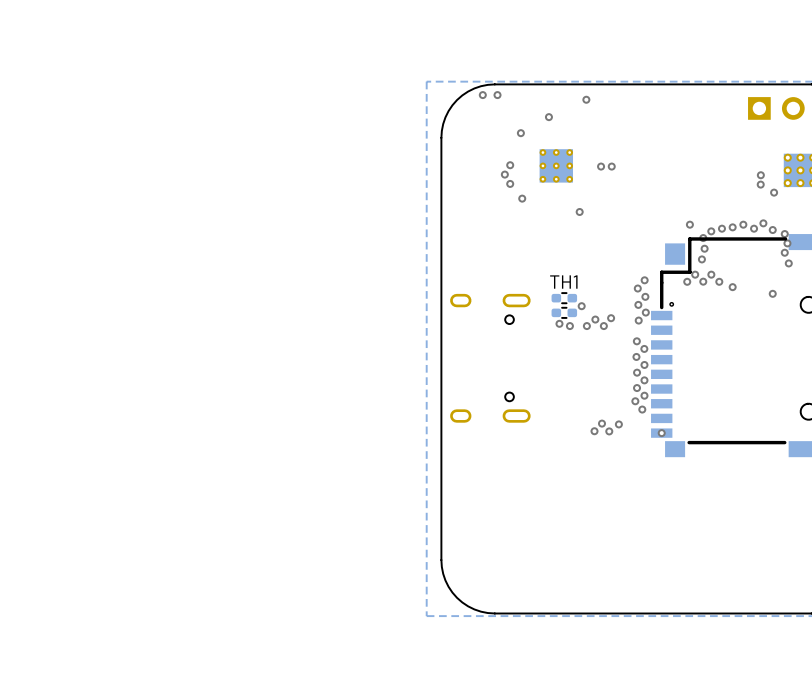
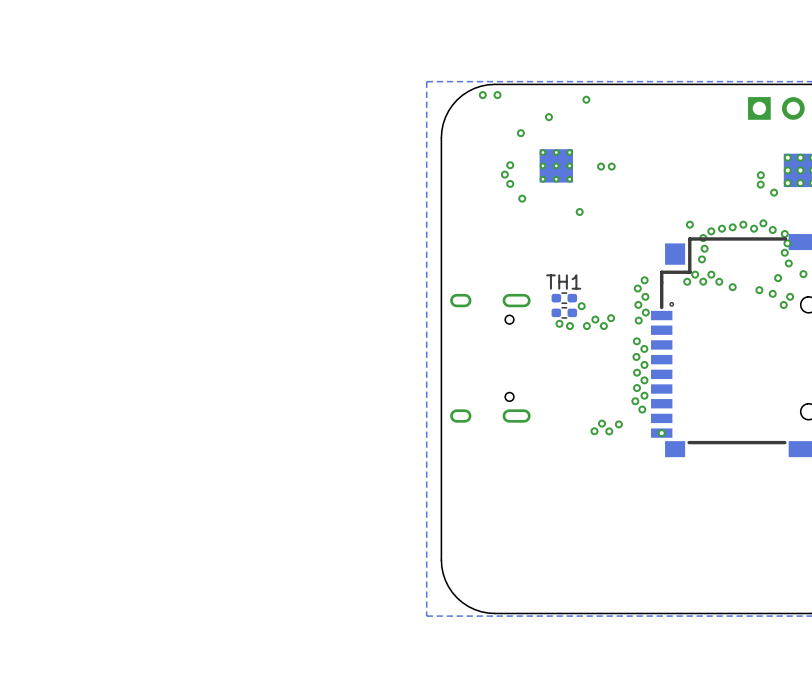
via: none -> (803, 274)
via: none -> (778, 278)
via: none -> (759, 290)
via: none -> (790, 296)
via: none -> (783, 304)

